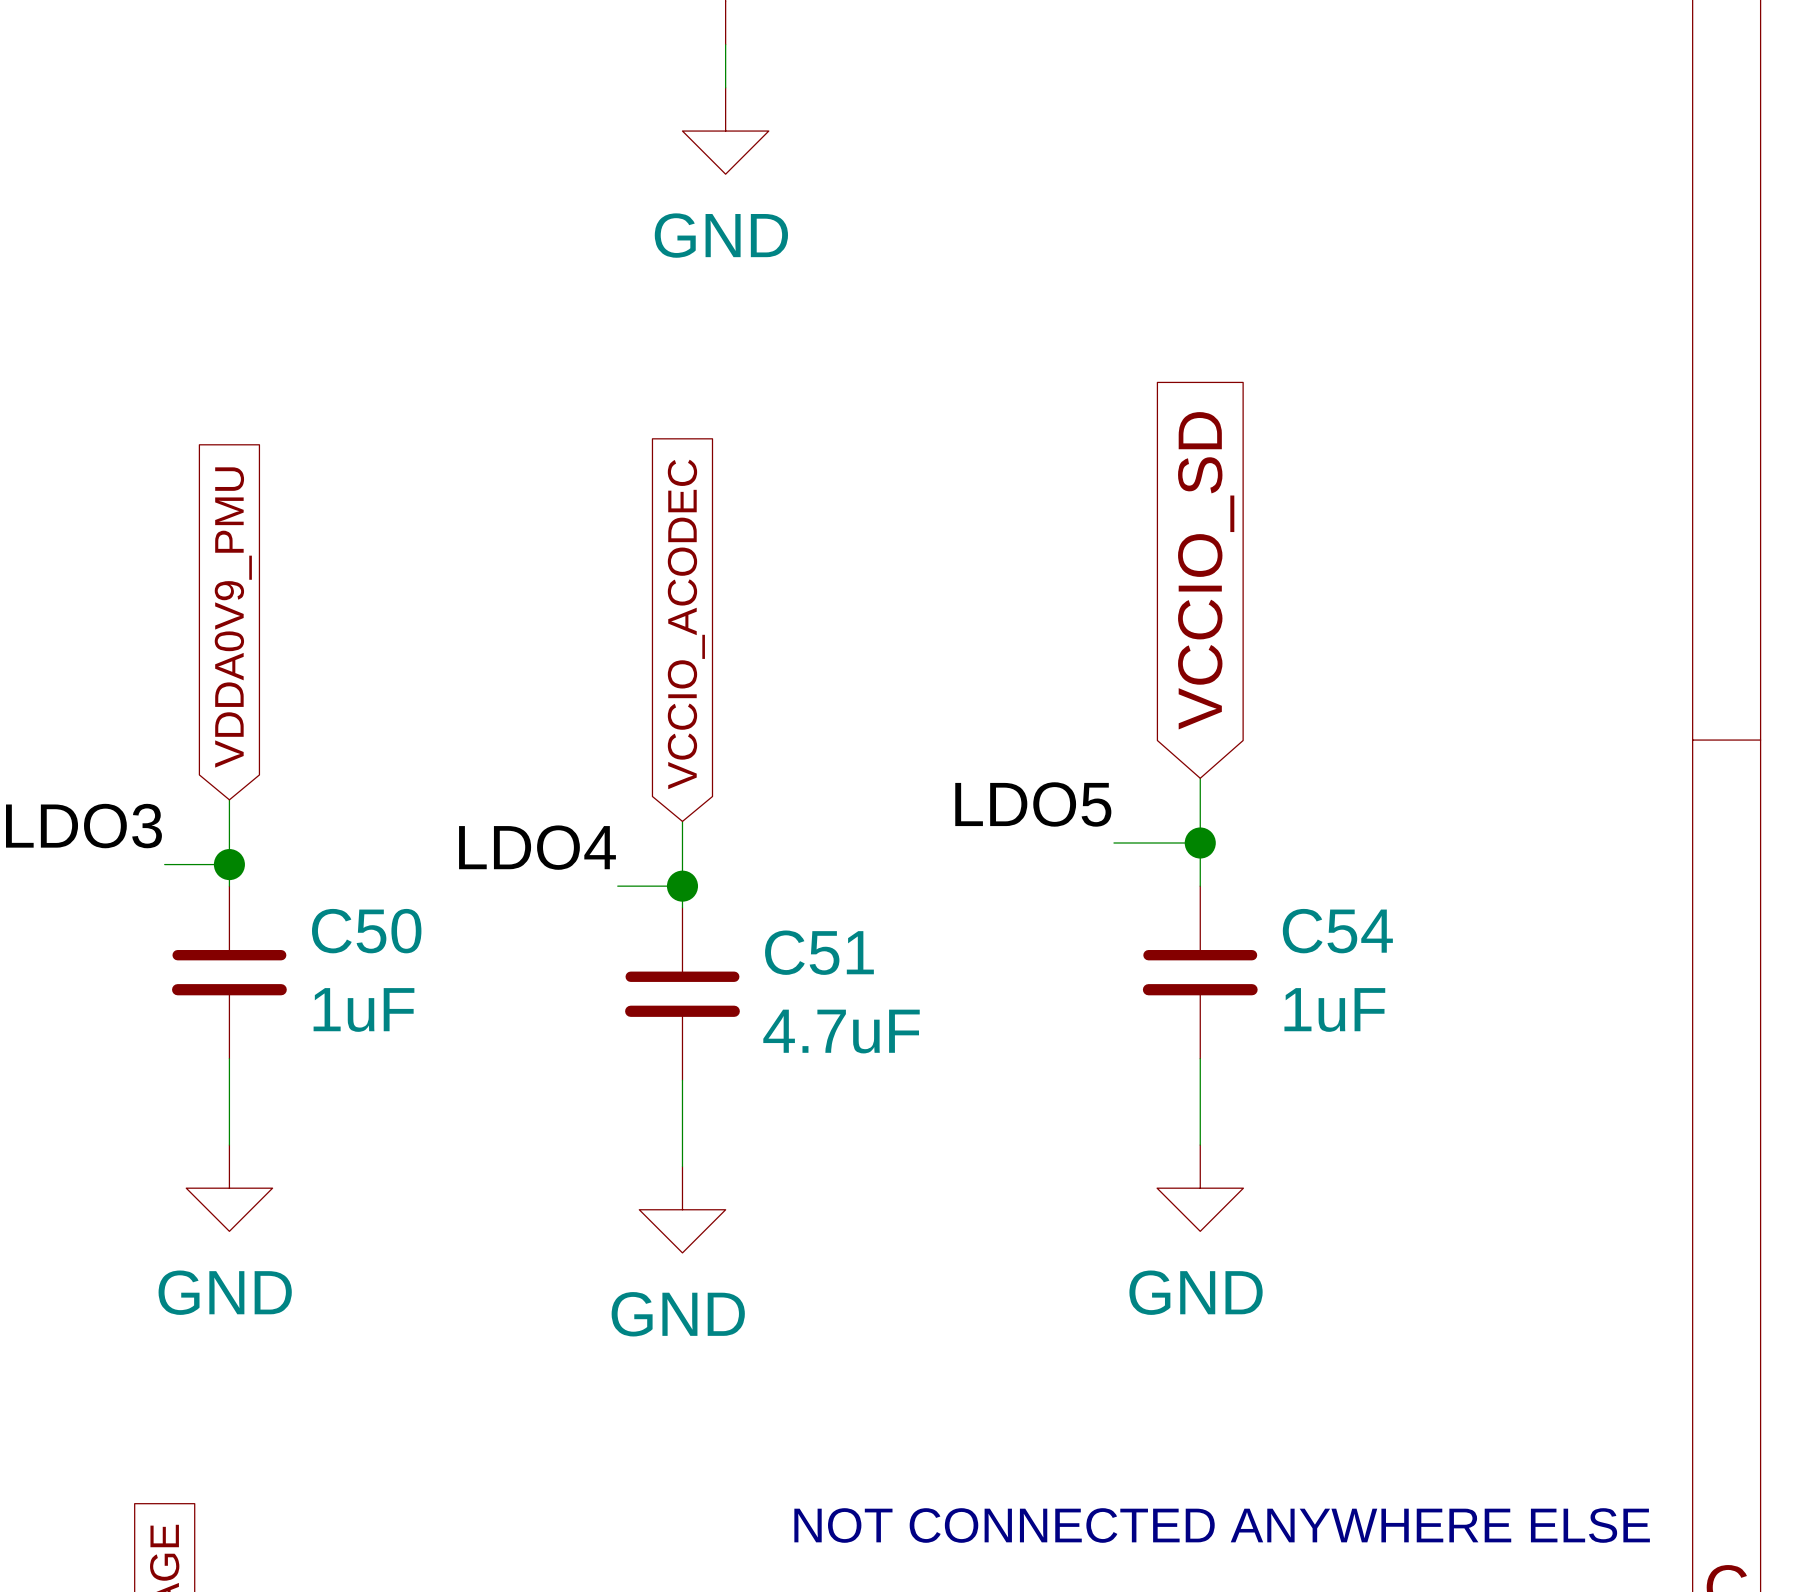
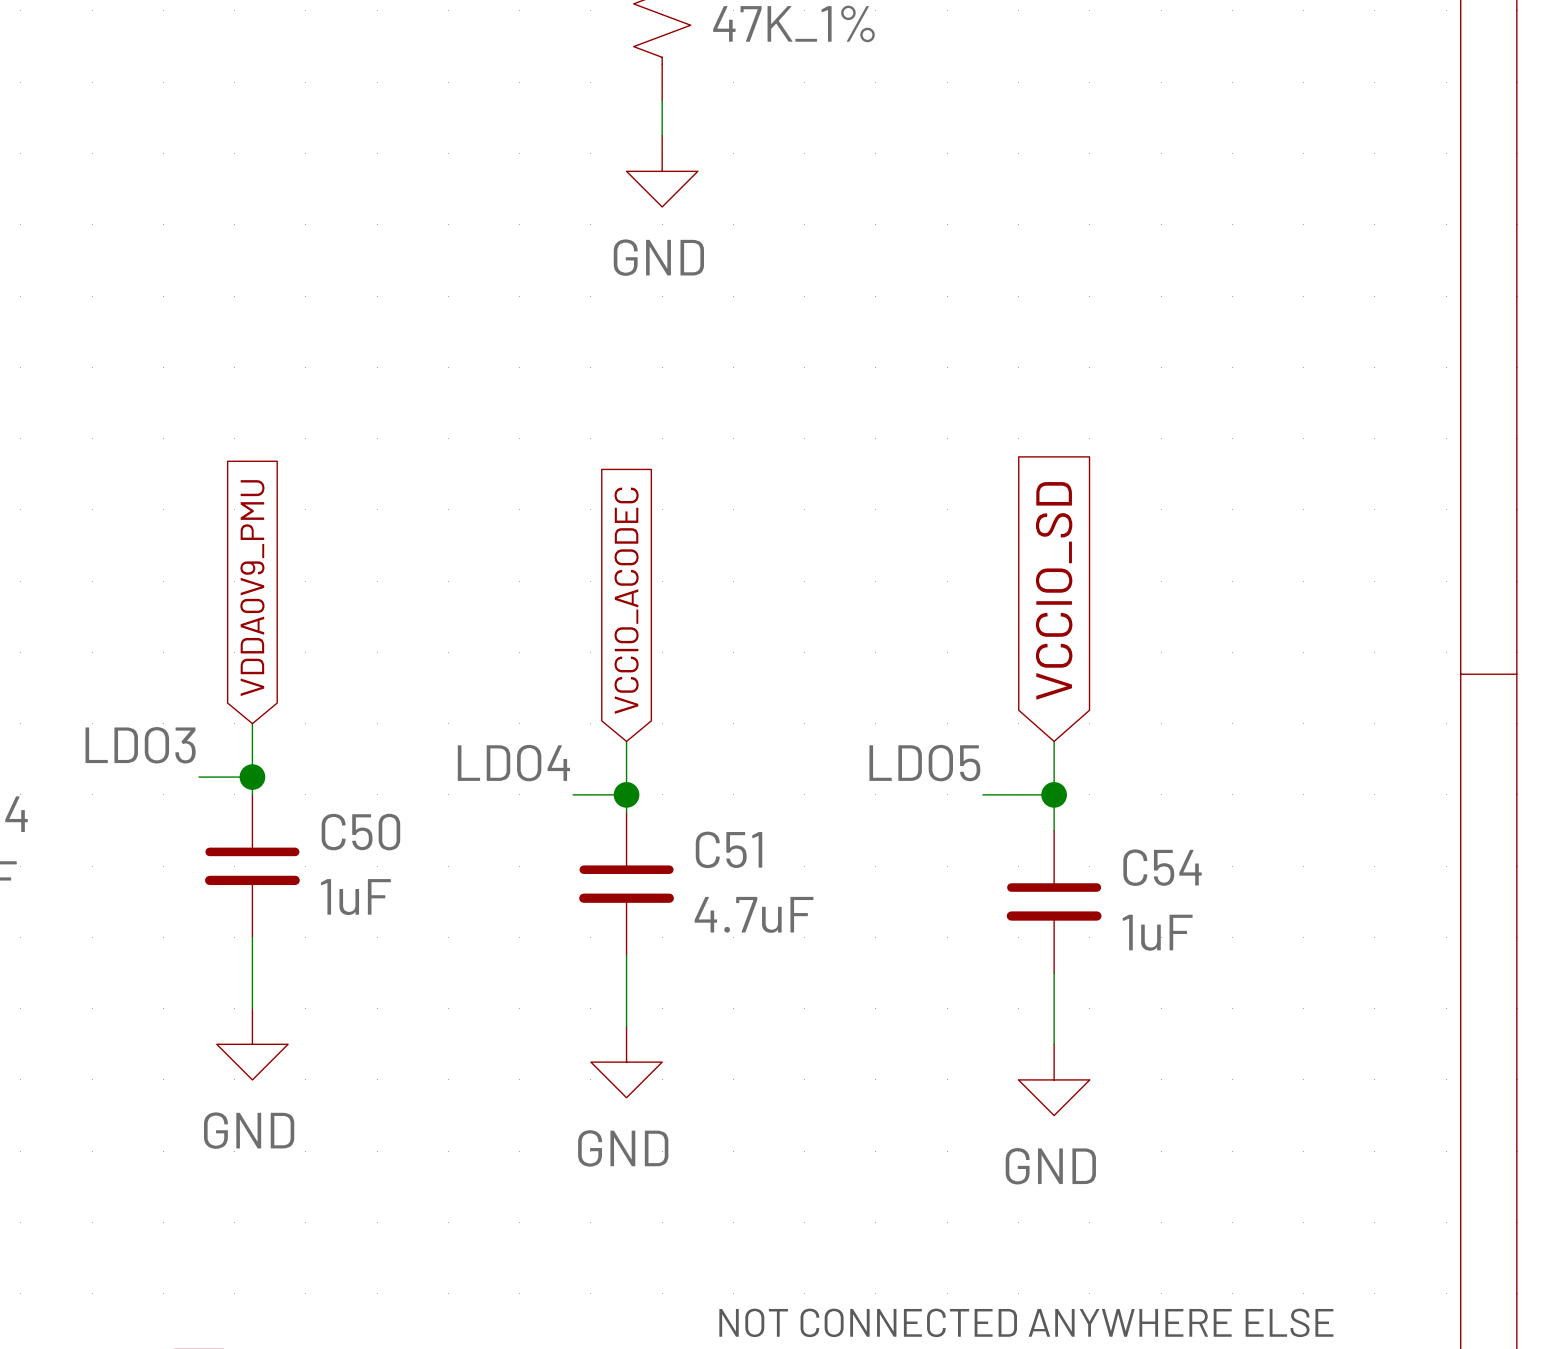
global label position: VCCIO_SD (1206, 570) -> VCCIO_SD (1054, 590)
wire: (1200, 778) (1200, 821) -> none
label position: LDO5 (1033, 804) -> LDO5 (924, 763)
wire: (1113, 843) (1200, 843) -> none
junction position: (1200, 843) -> (1054, 794)
wire: none -> (982, 794) (1054, 794) (1054, 830)
C54 position: (1200, 972) -> (1054, 901)
power symbol position: GND (1200, 1188) -> GND (1054, 1079)

